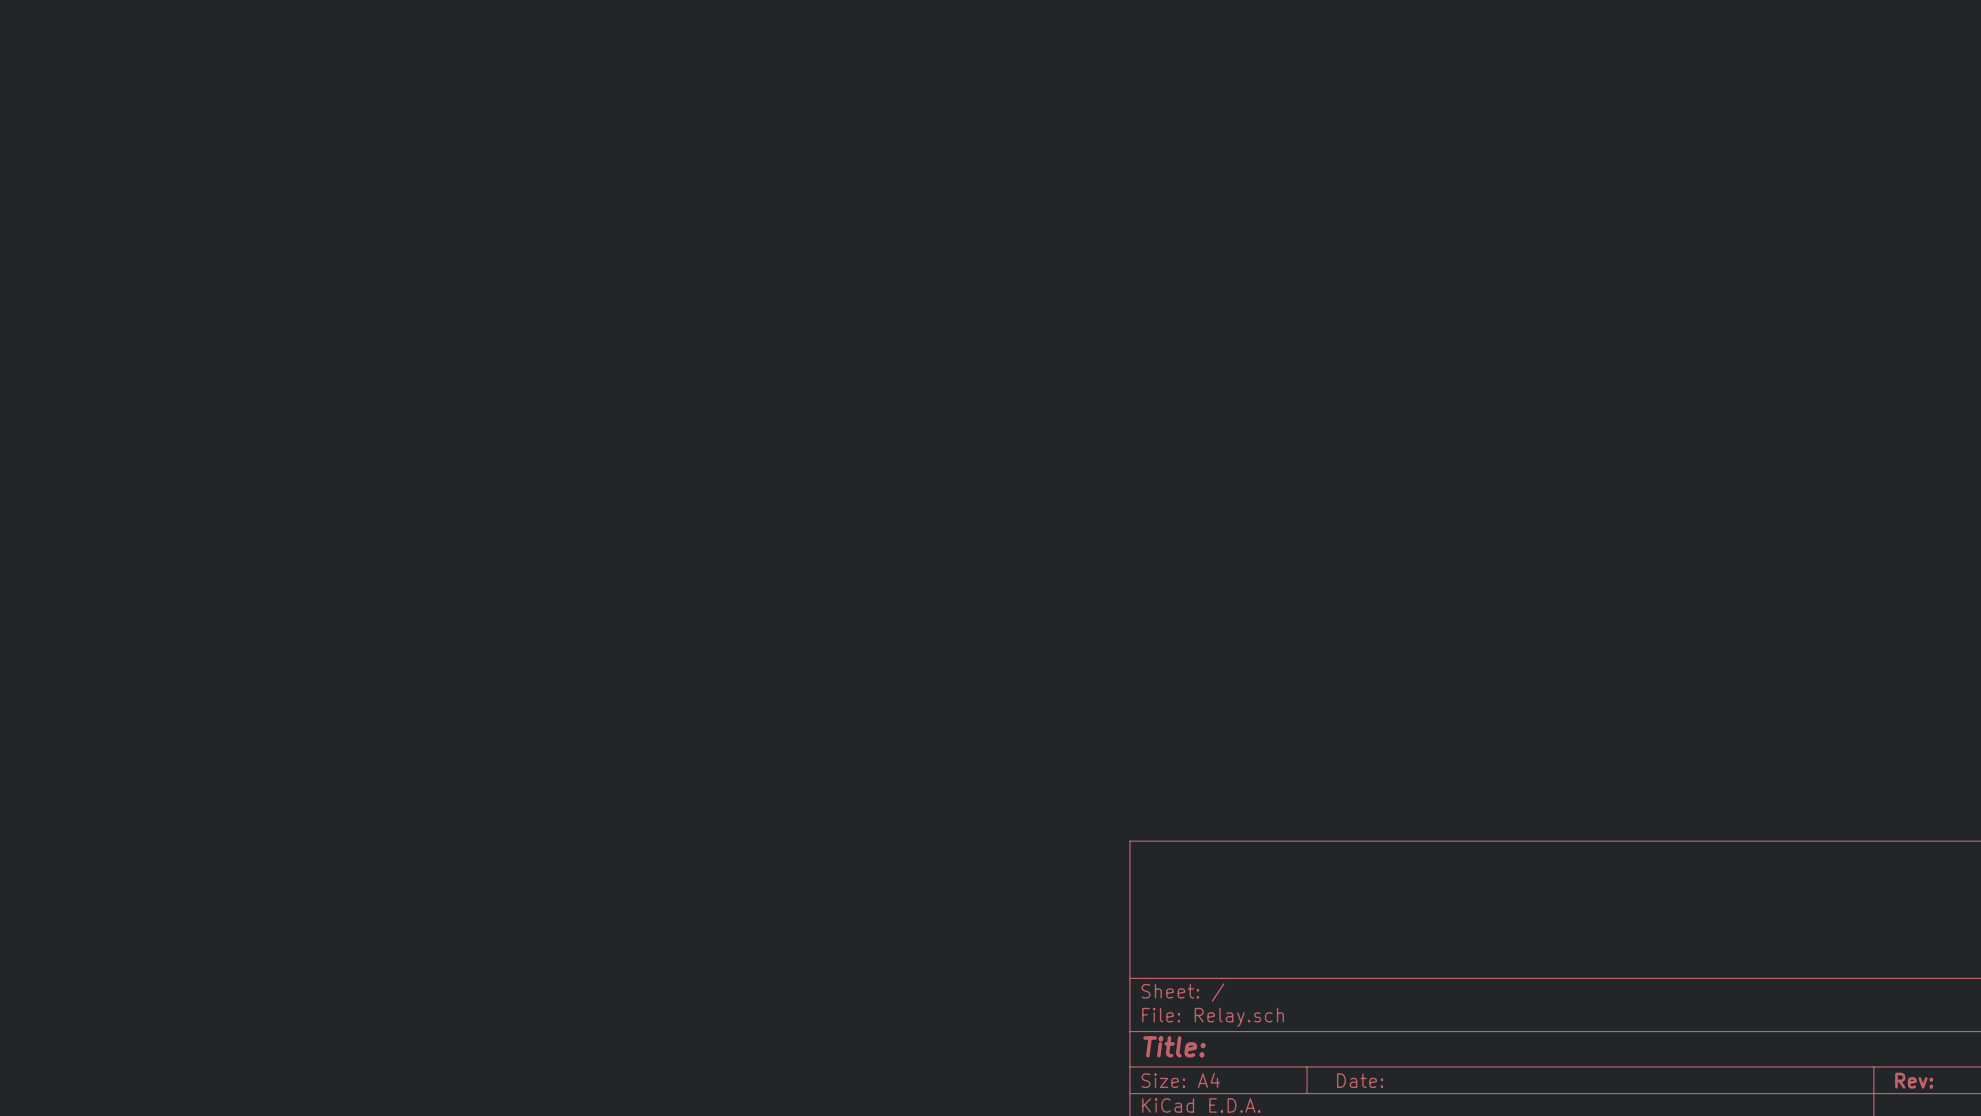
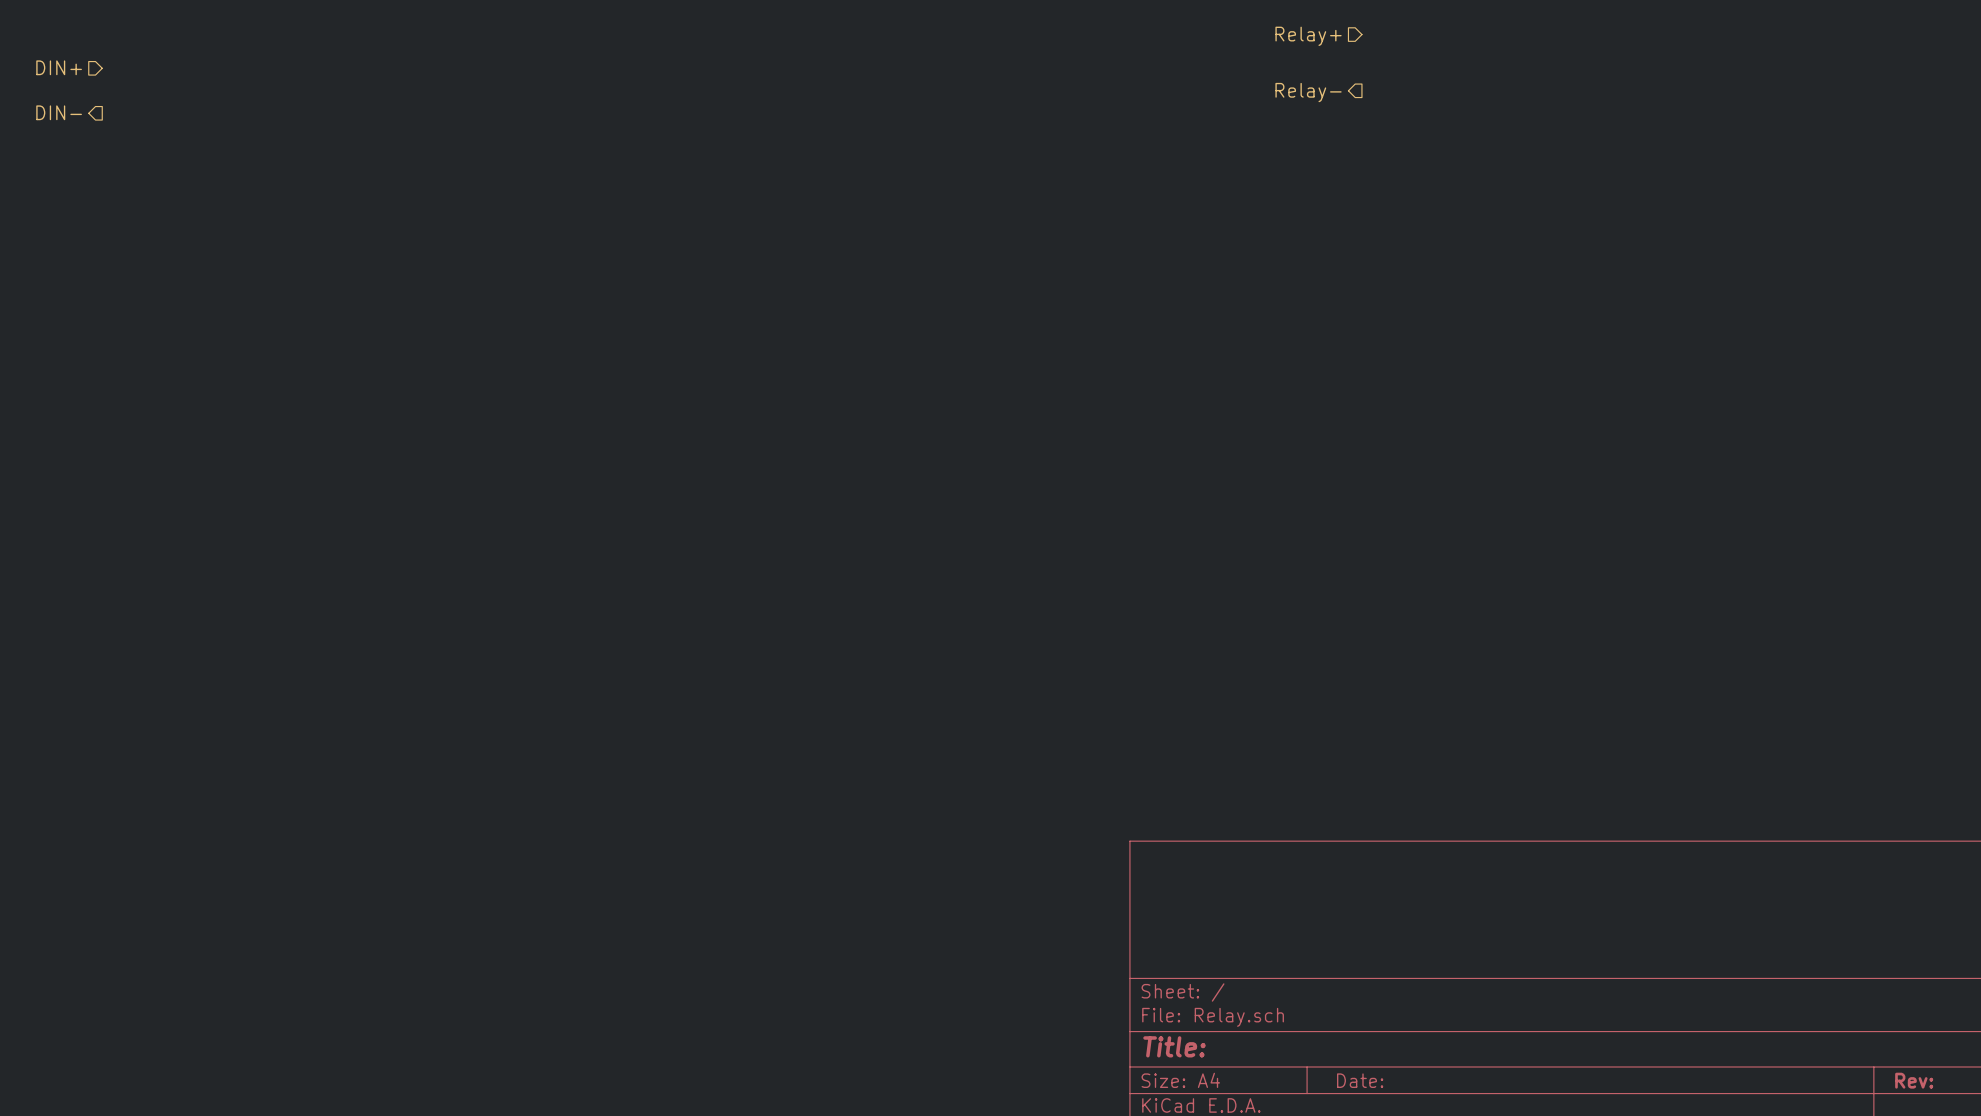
hierarchical label: none -> Relay+ (1308, 36)
hierarchical label: none -> DIN+ (59, 67)
hierarchical label: none -> Relay- (1308, 92)
hierarchical label: none -> DIN- (59, 112)

